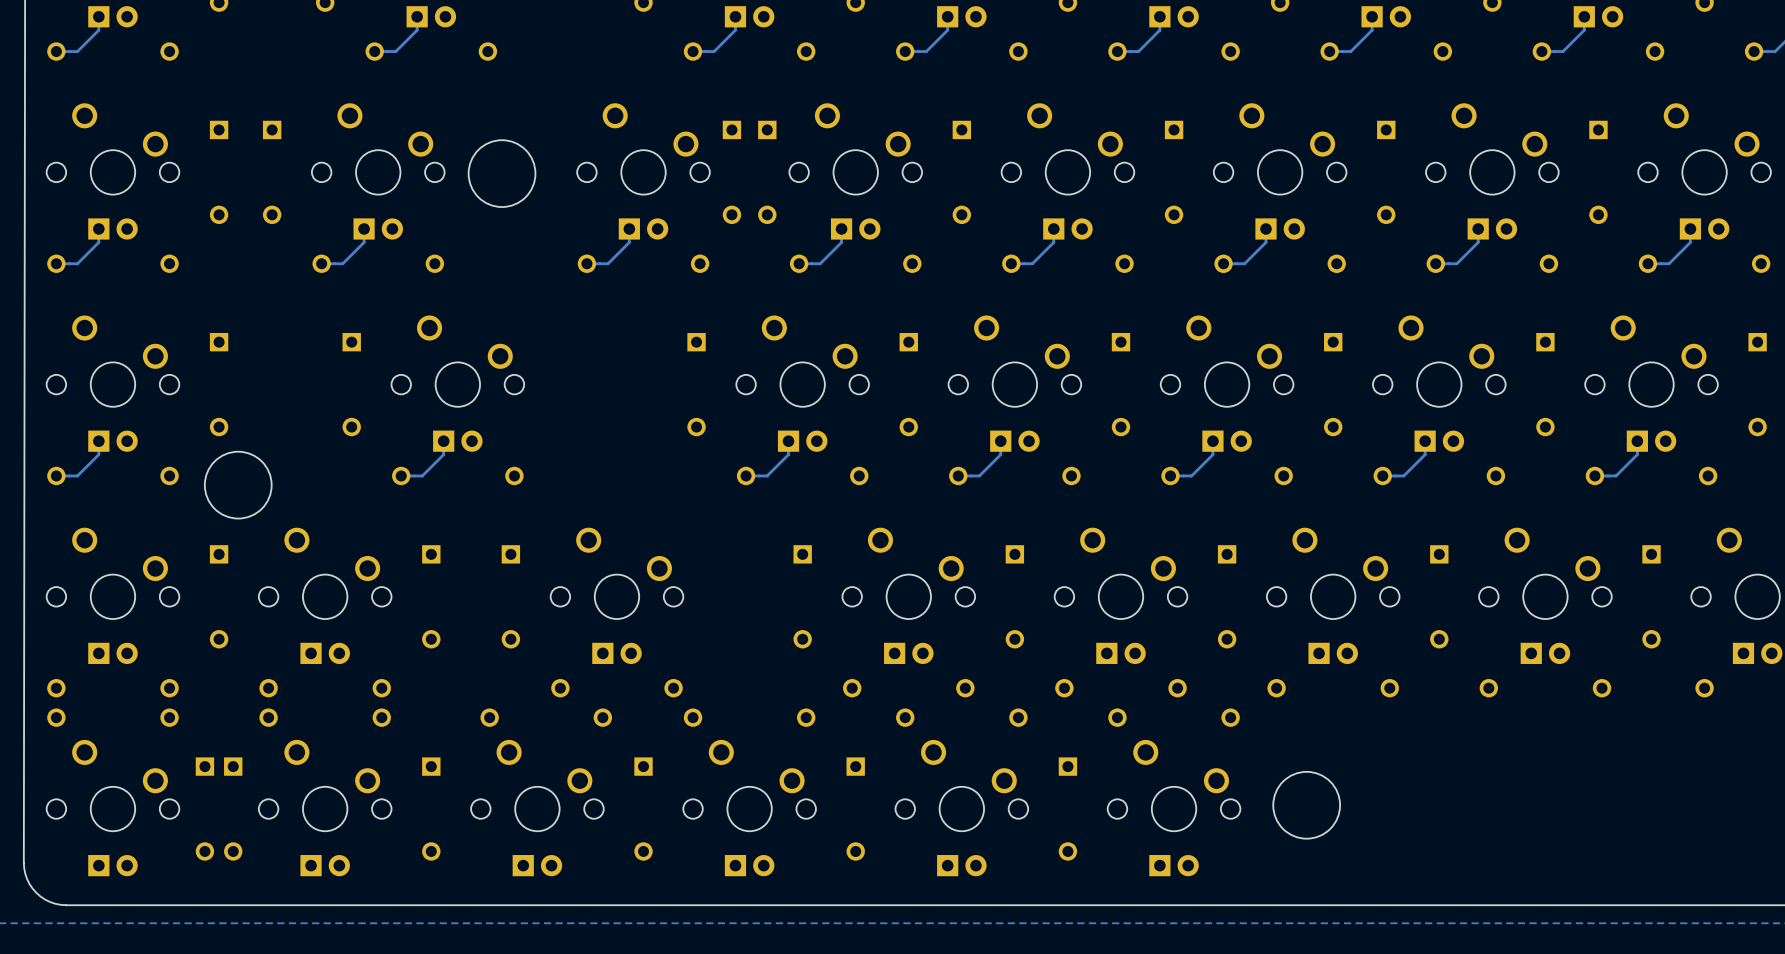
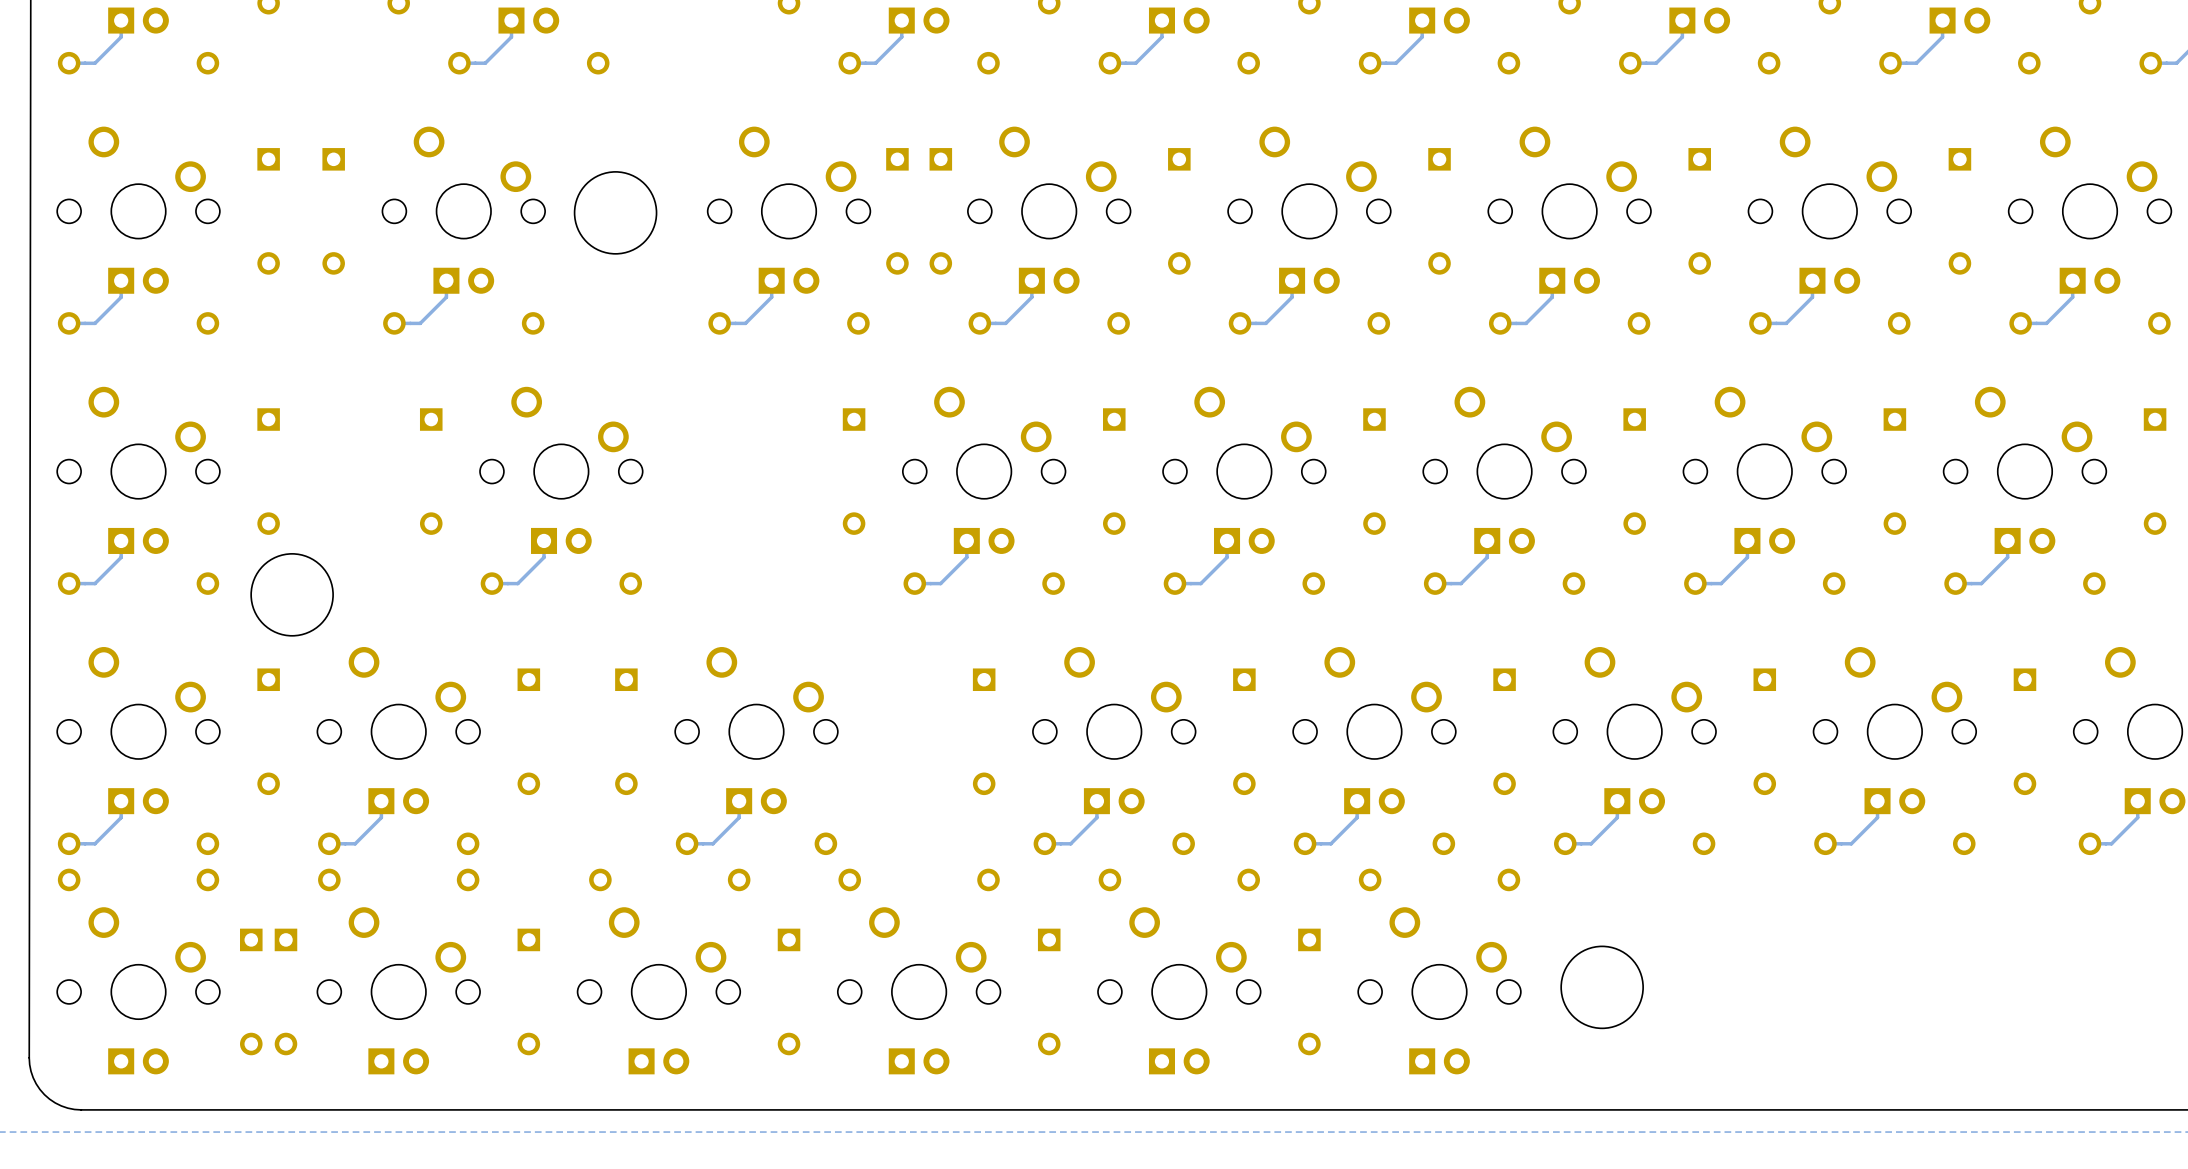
track: none -> (121, 801) (121, 817) (95, 843) (69, 843)
track: none -> (381, 801) (381, 817) (355, 843) (329, 843)
track: none -> (739, 801) (739, 817) (712, 843) (687, 843)
track: none -> (1096, 801) (1096, 817) (1070, 843) (1044, 843)
track: none -> (1357, 801) (1357, 817) (1330, 843) (1305, 843)
track: none -> (1617, 801) (1617, 817) (1591, 843) (1565, 843)
track: none -> (1877, 801) (1877, 817) (1851, 843) (1825, 843)
track: none -> (2137, 801) (2137, 817) (2111, 843) (2090, 843)

